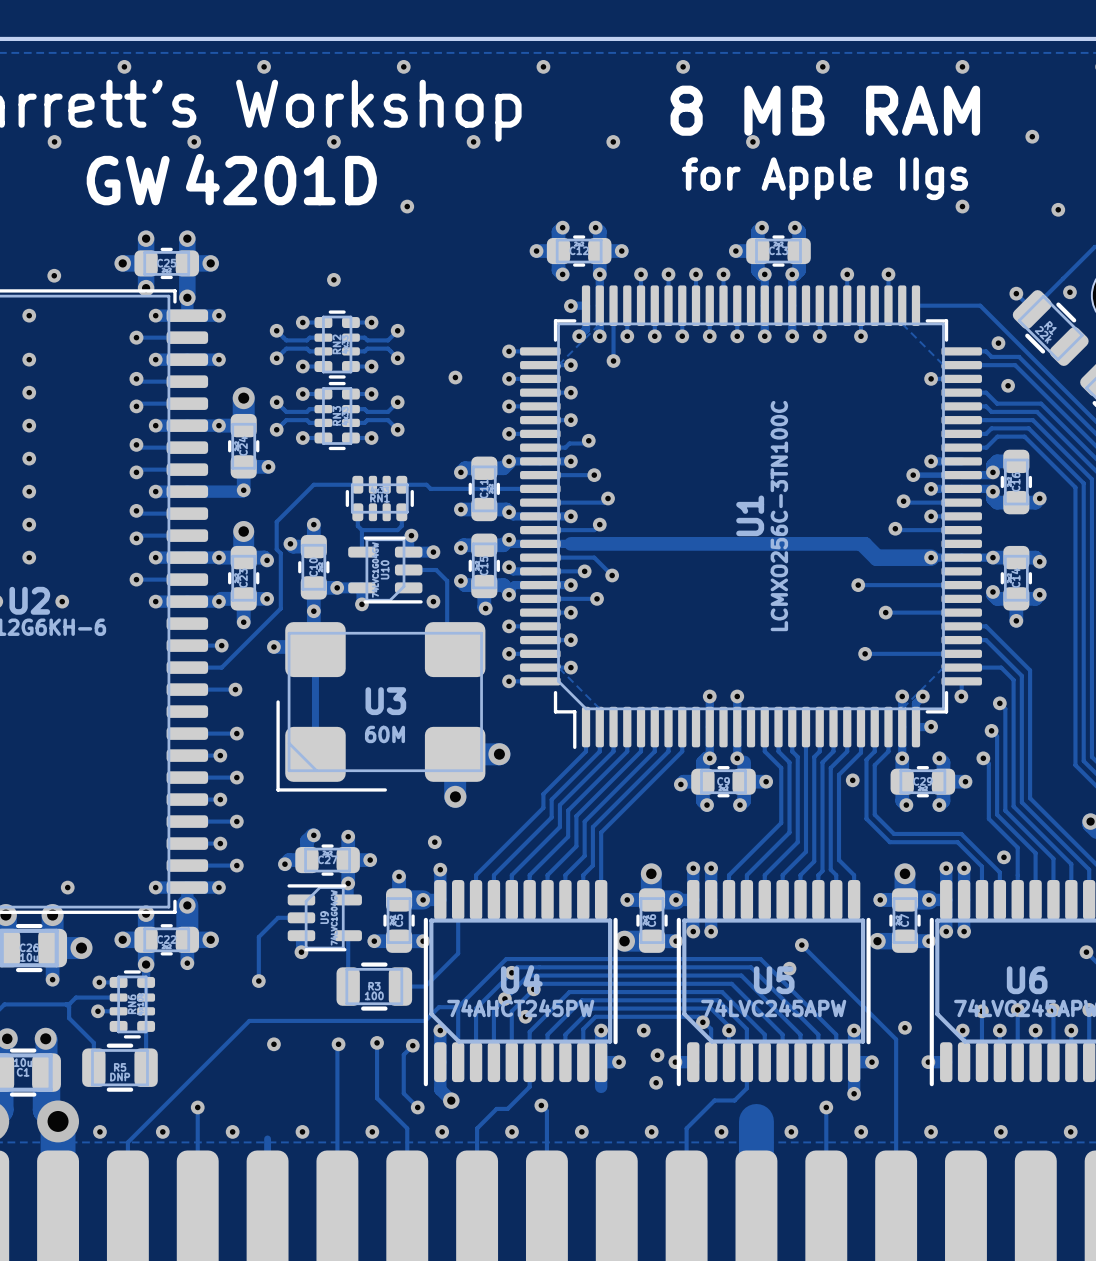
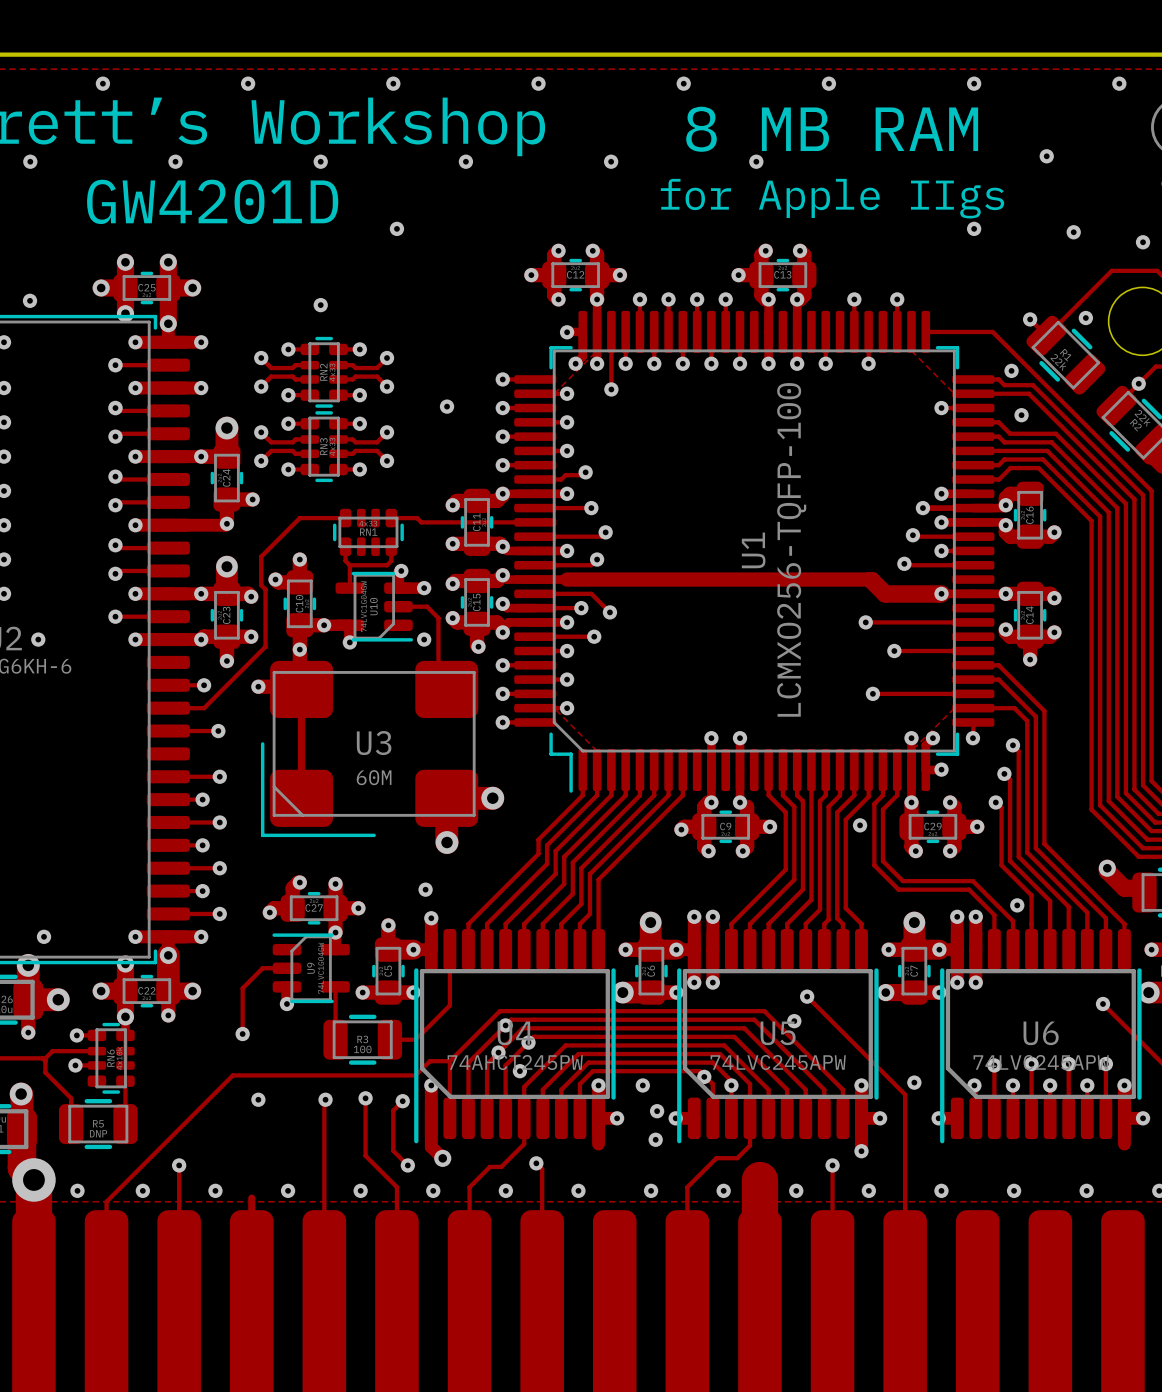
U1 value: LCMXO256C-3TN100C (779, 516) -> LCMXO256-TQFP-100 (791, 549)

